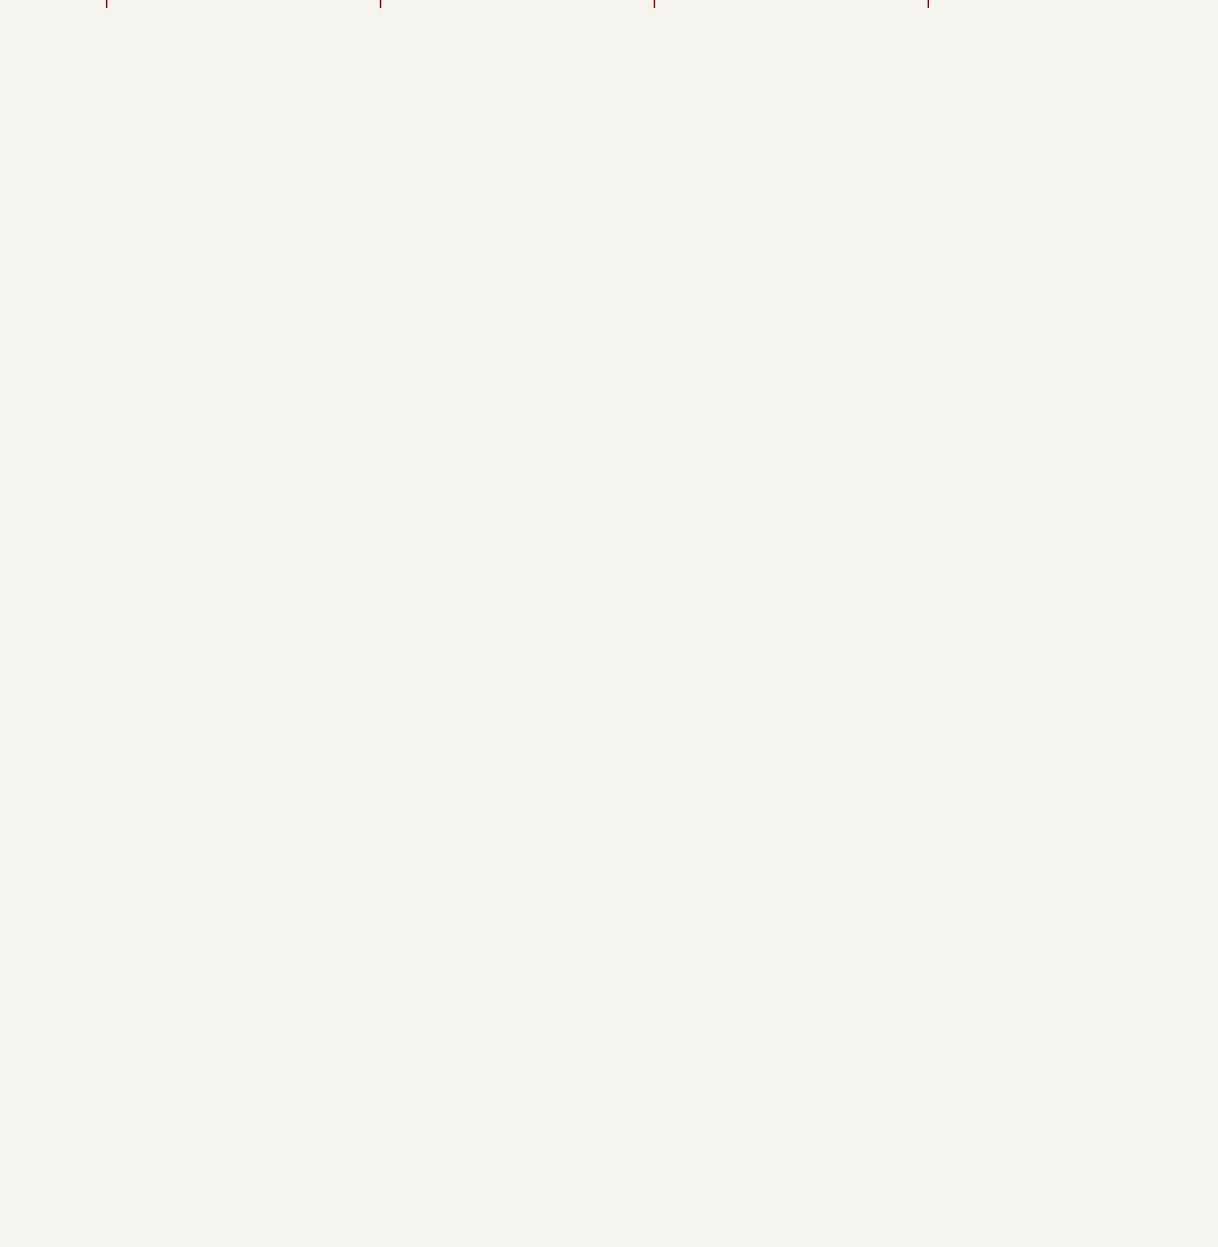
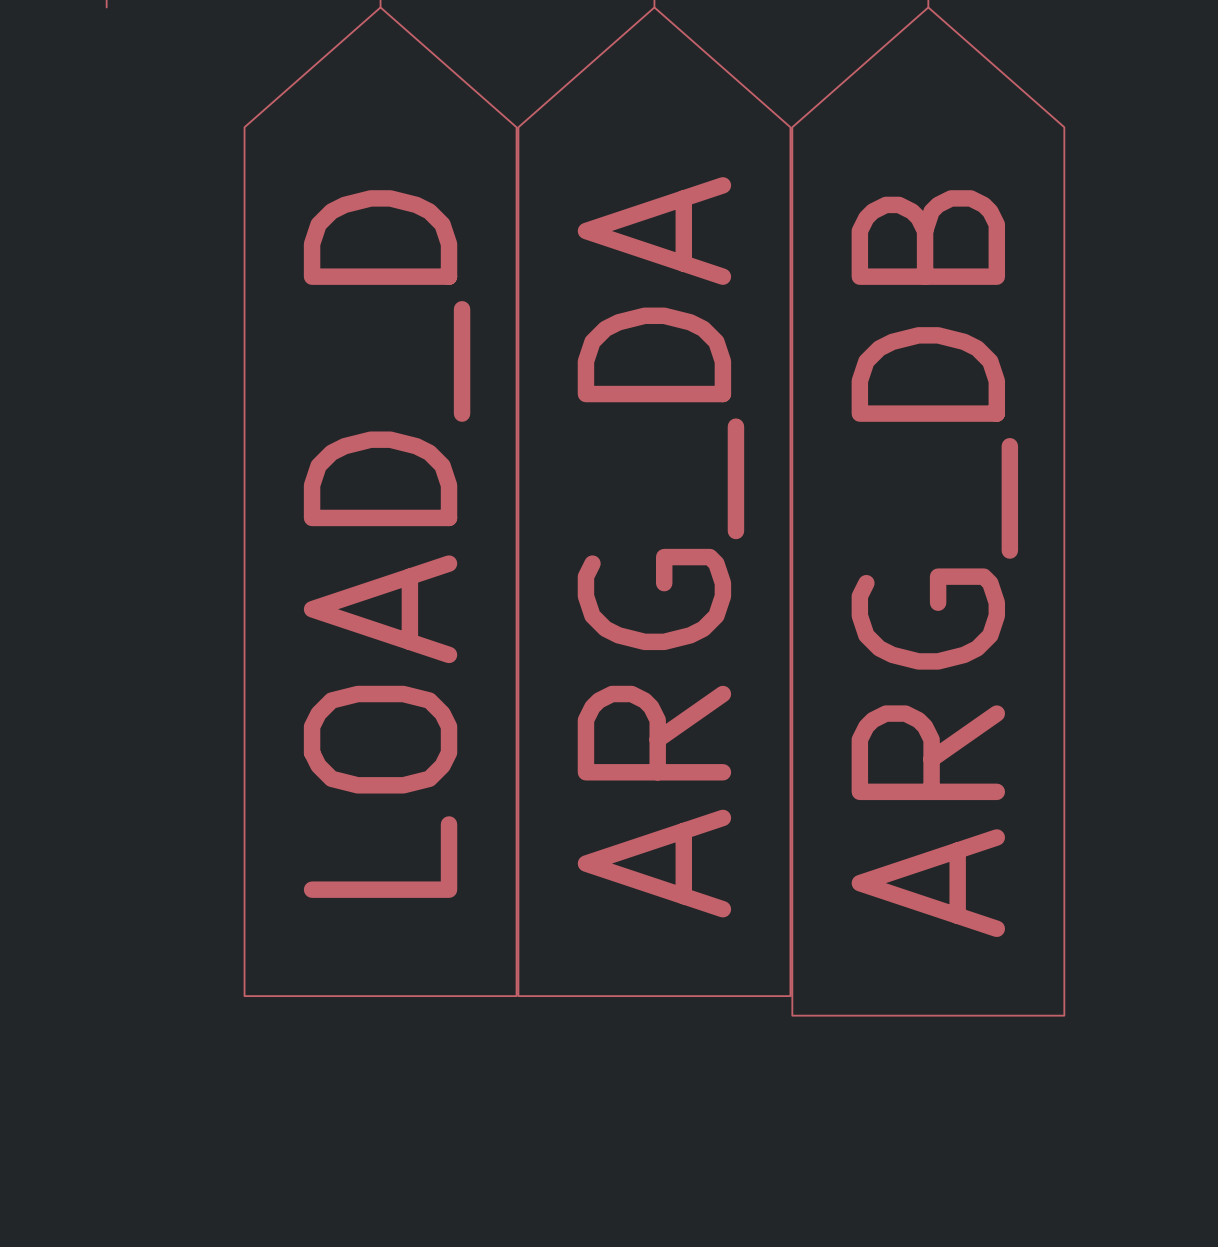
global label: none -> LOAD_D (387, 544)
global label: none -> ARG_DA (660, 547)
global label: none -> ARG_DB (934, 563)

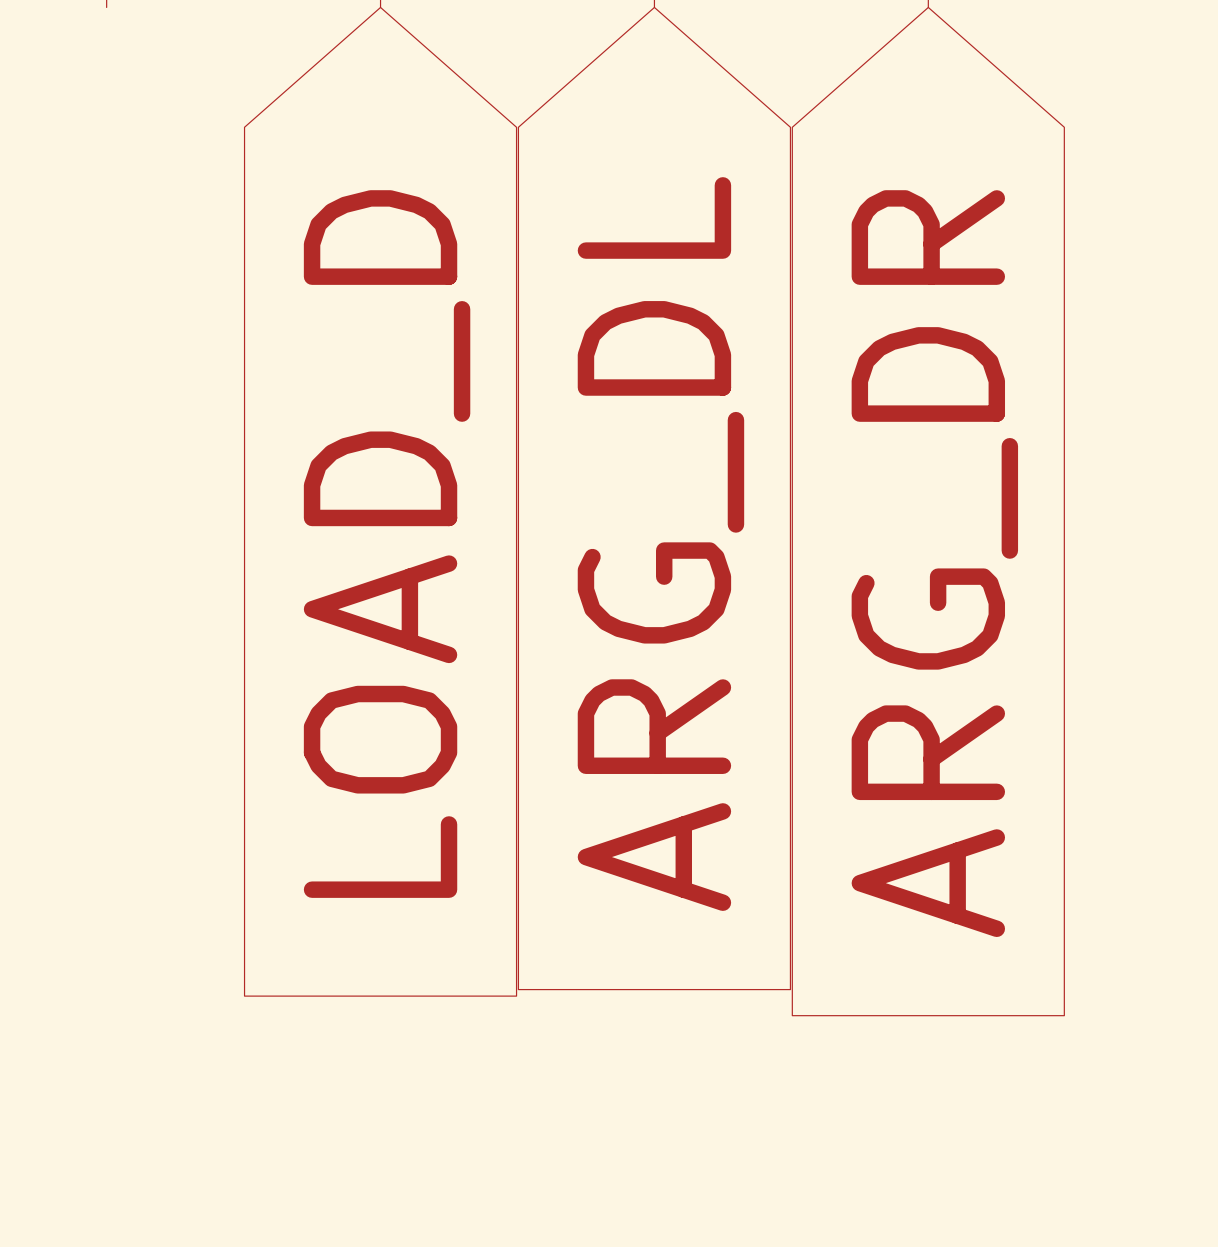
global label: ARG_DA (660, 547) -> ARG_DL (660, 544)
global label: ARG_DB (934, 563) -> ARG_DR (934, 563)

